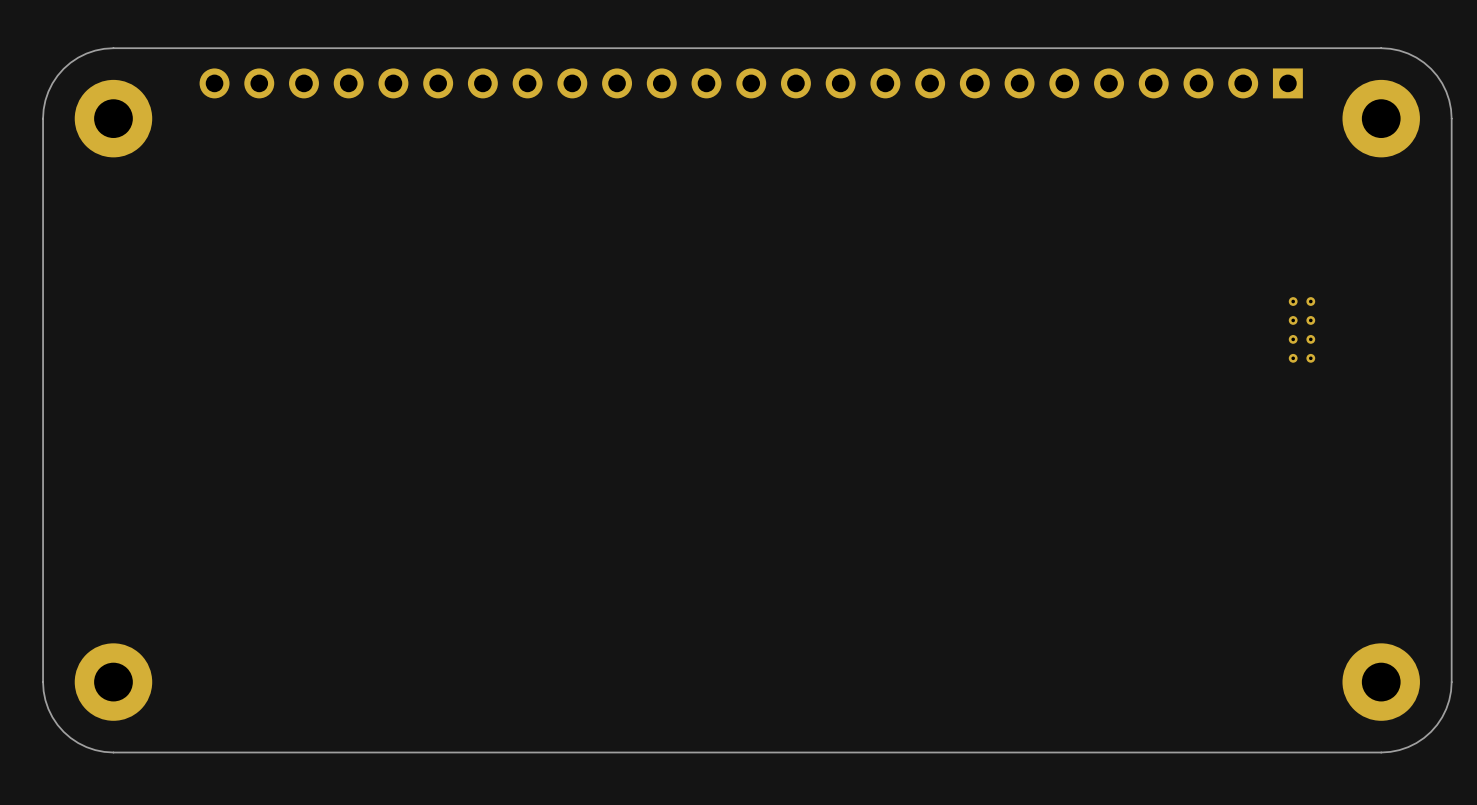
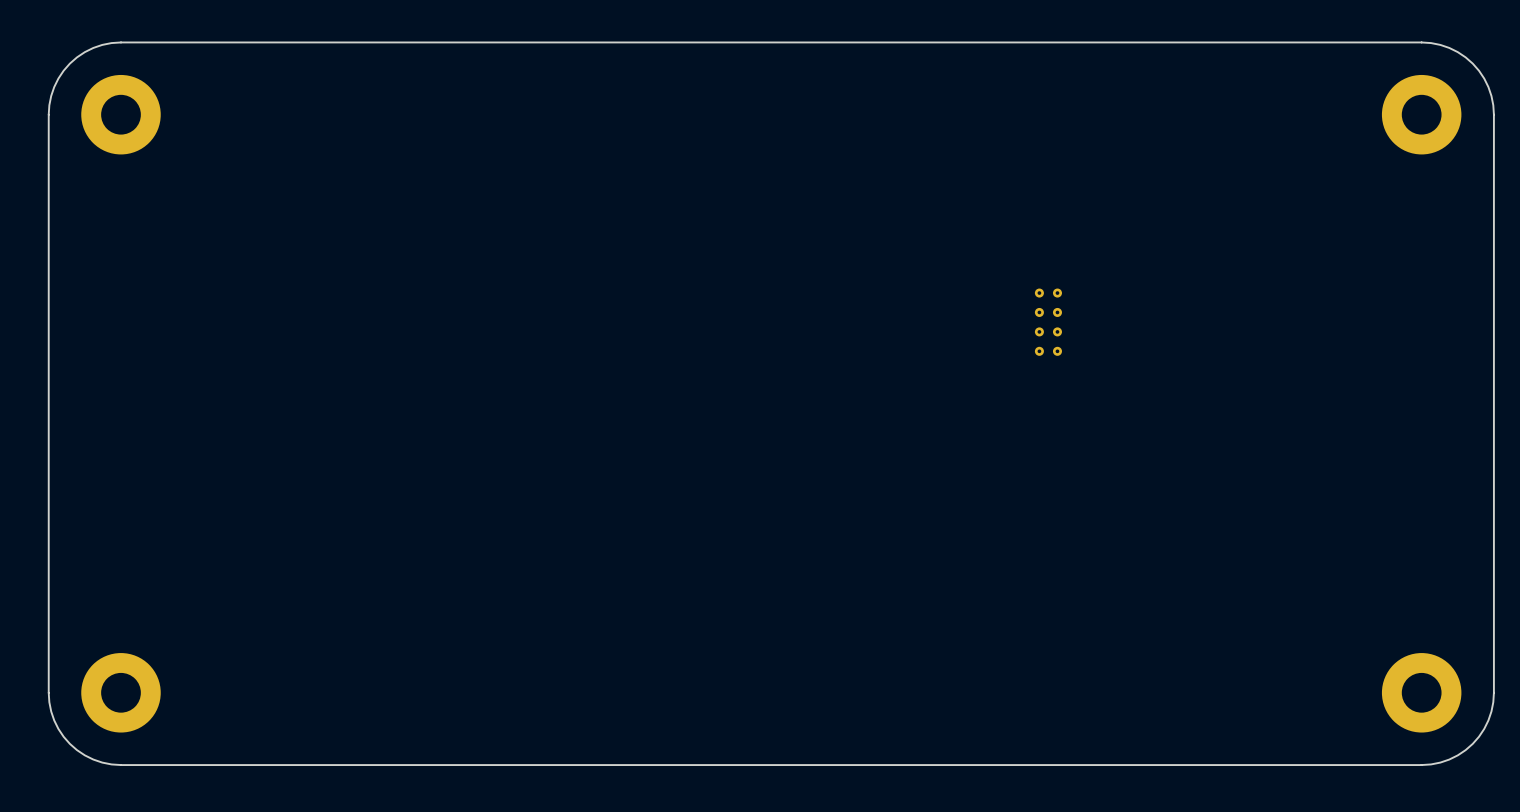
part: (751, 83) -> none
part position: (1301, 329) -> (1048, 322)

